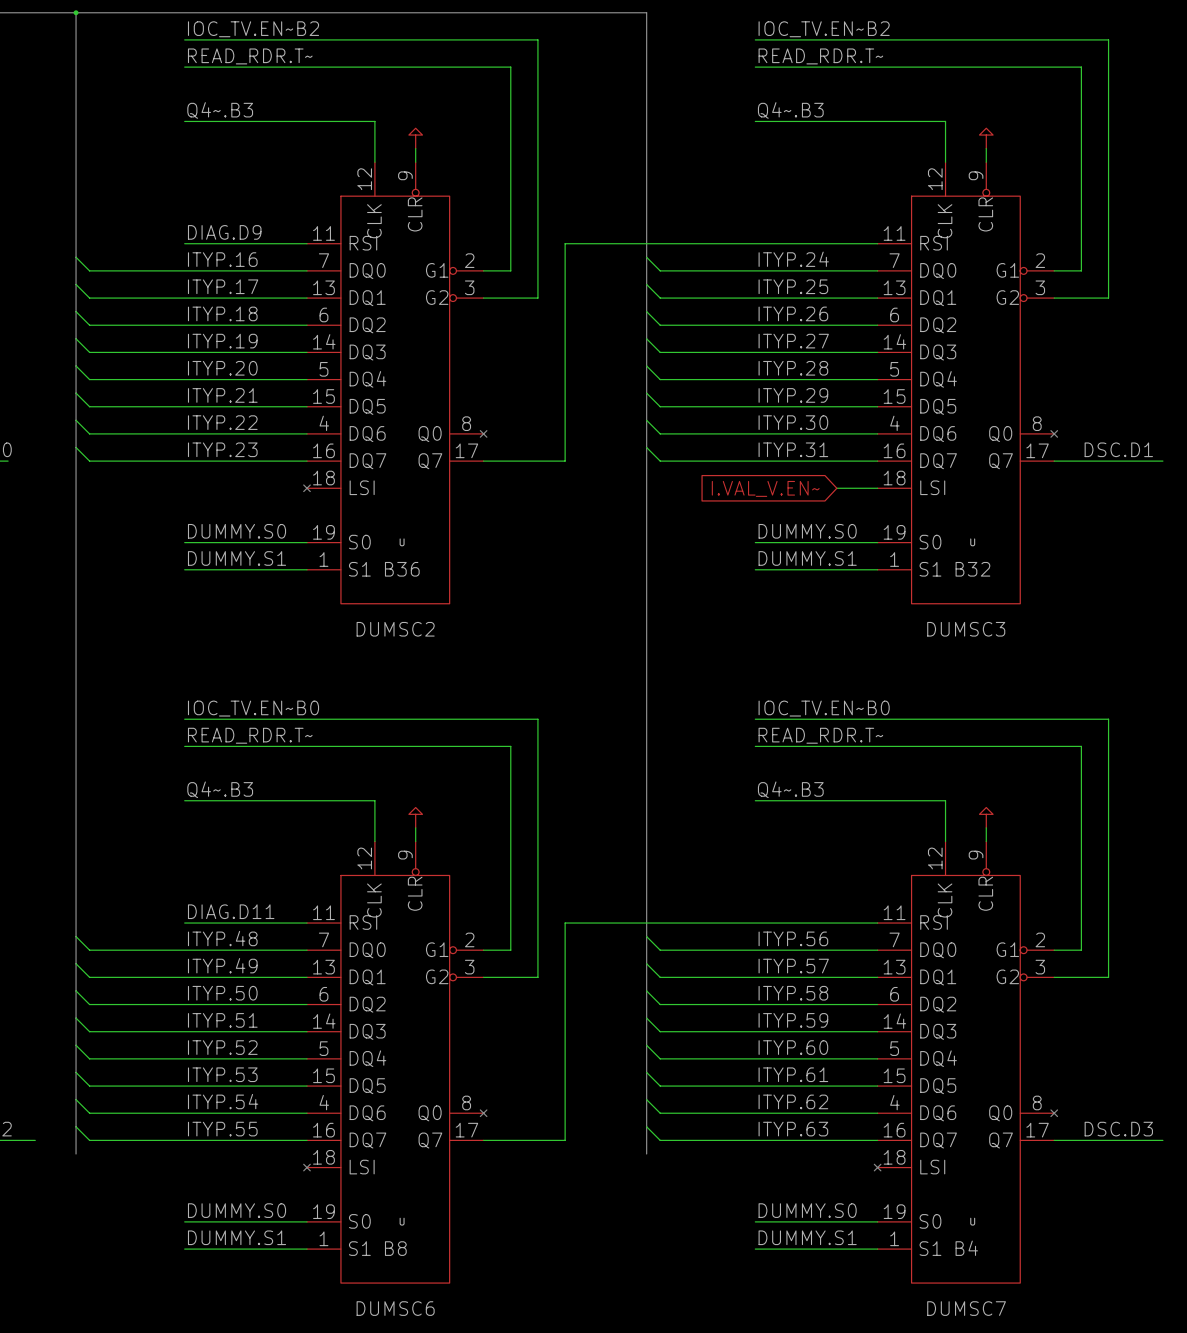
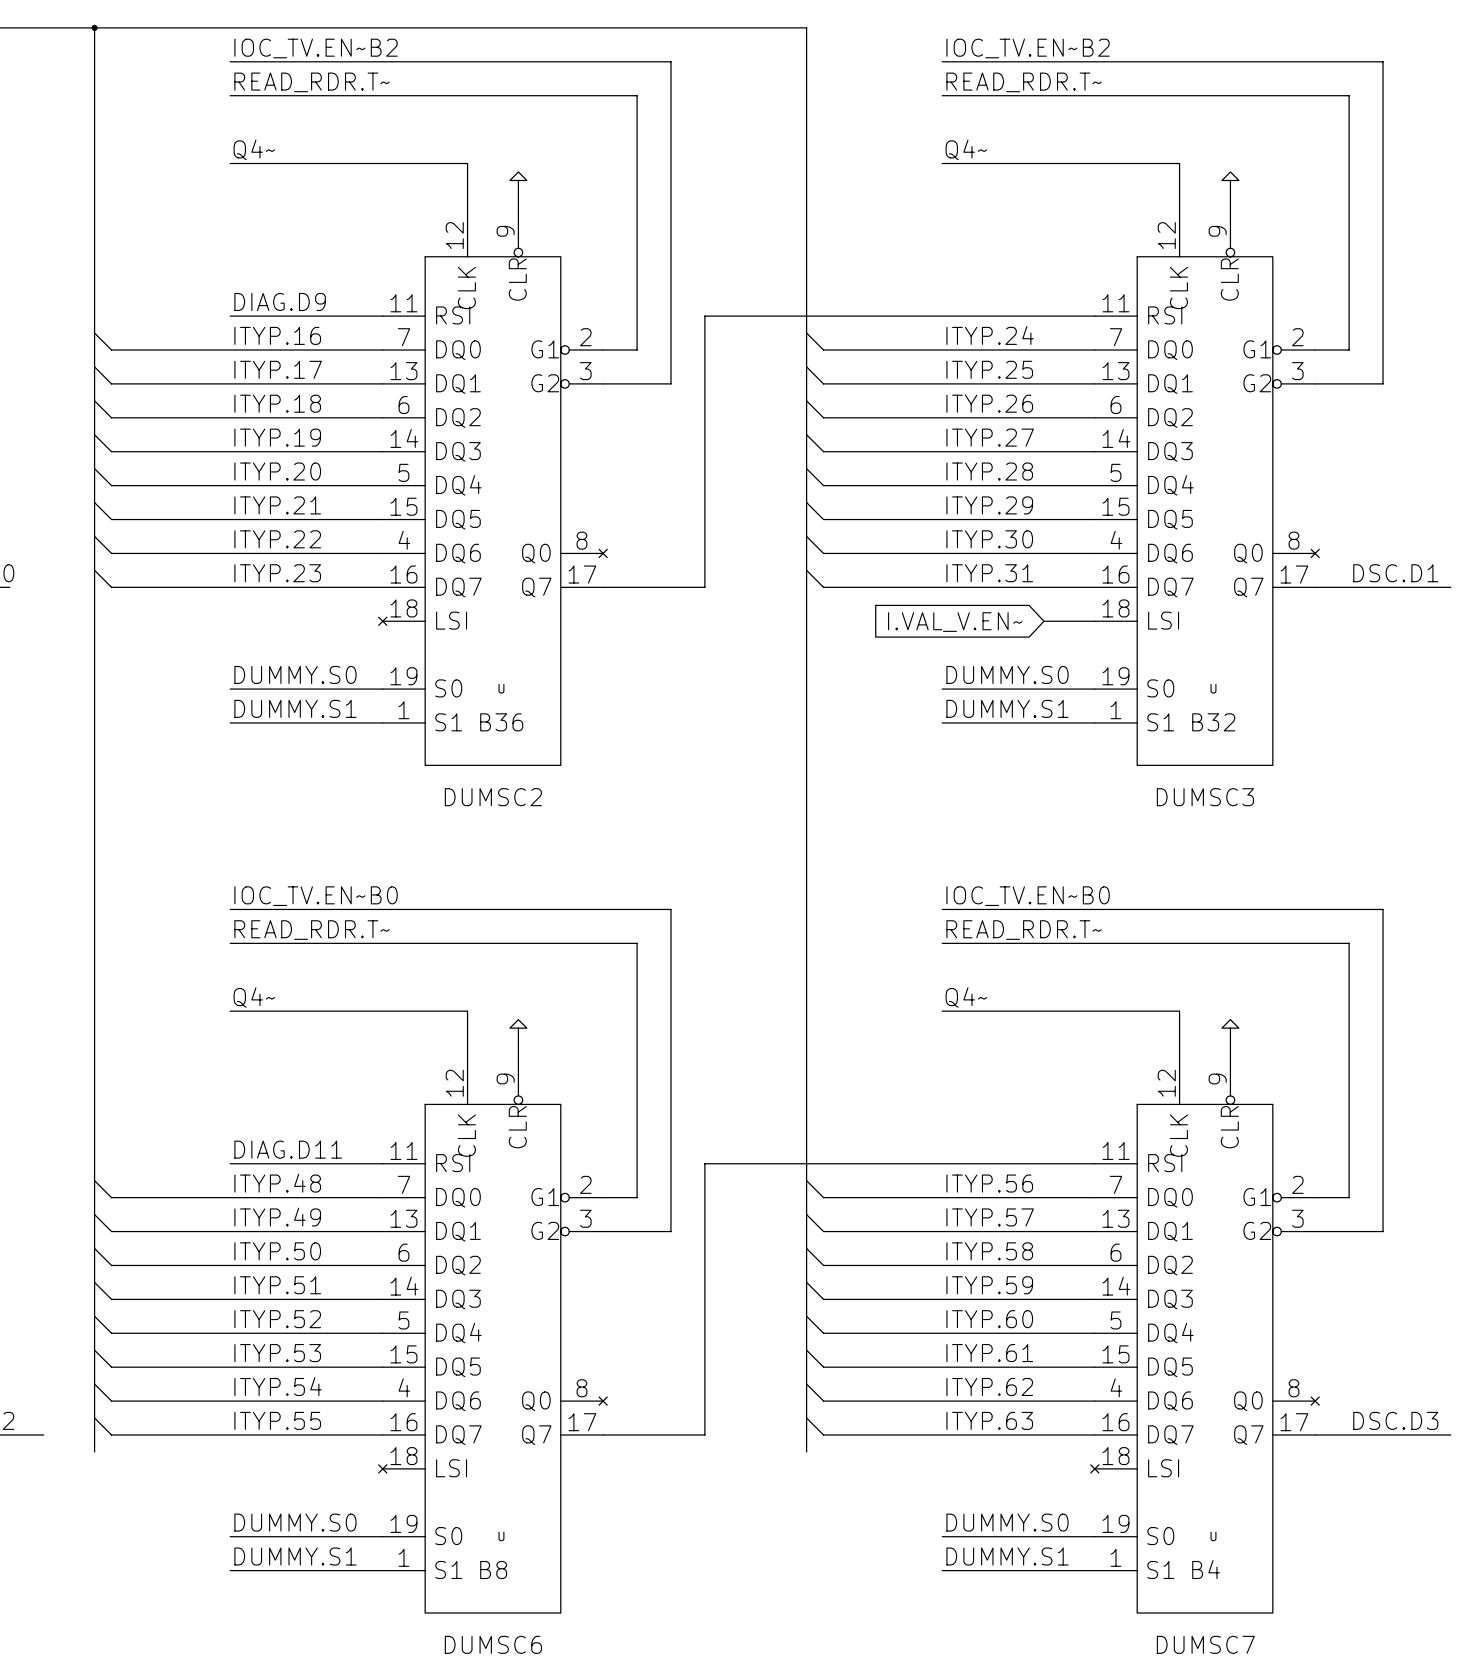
label: Q4~.B3 (220, 110) -> Q4~ (254, 149)
label: Q4~.B3 (790, 110) -> Q4~ (966, 149)
label: Q4~.B3 (220, 789) -> Q4~ (254, 997)
label: Q4~.B3 (790, 789) -> Q4~ (966, 997)

